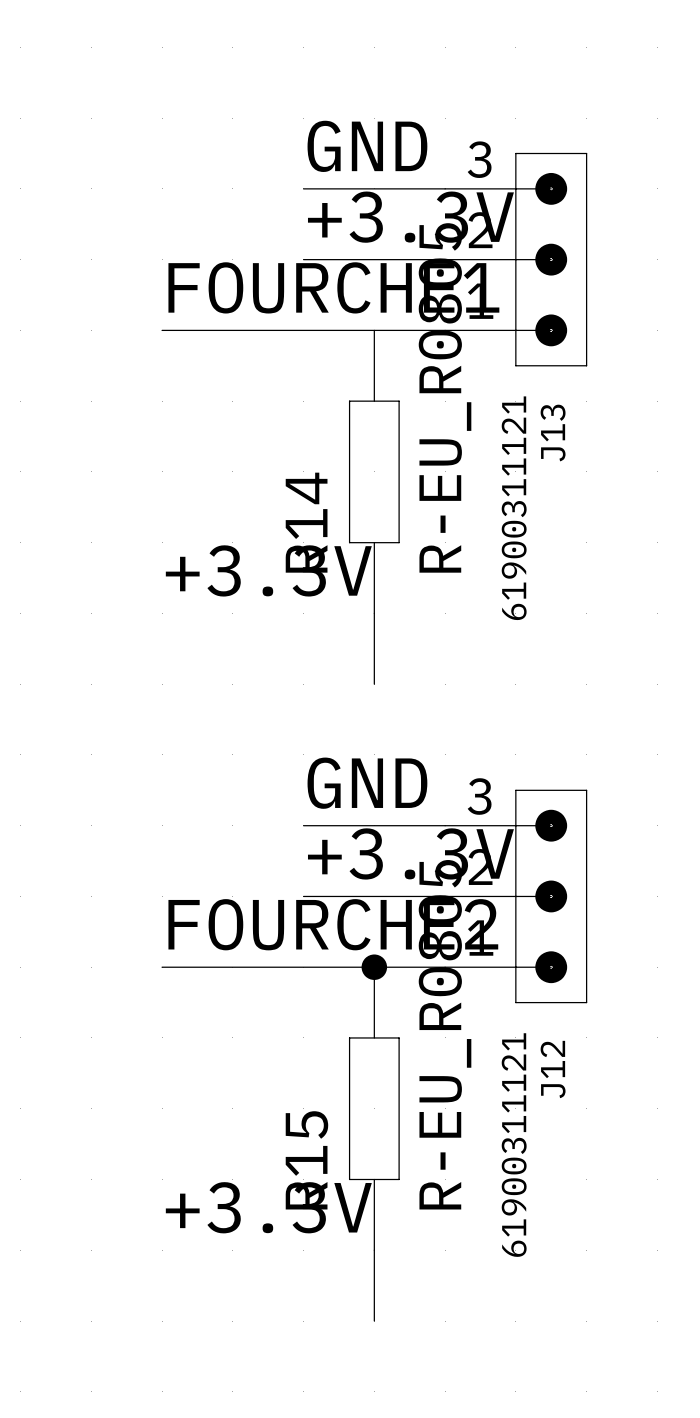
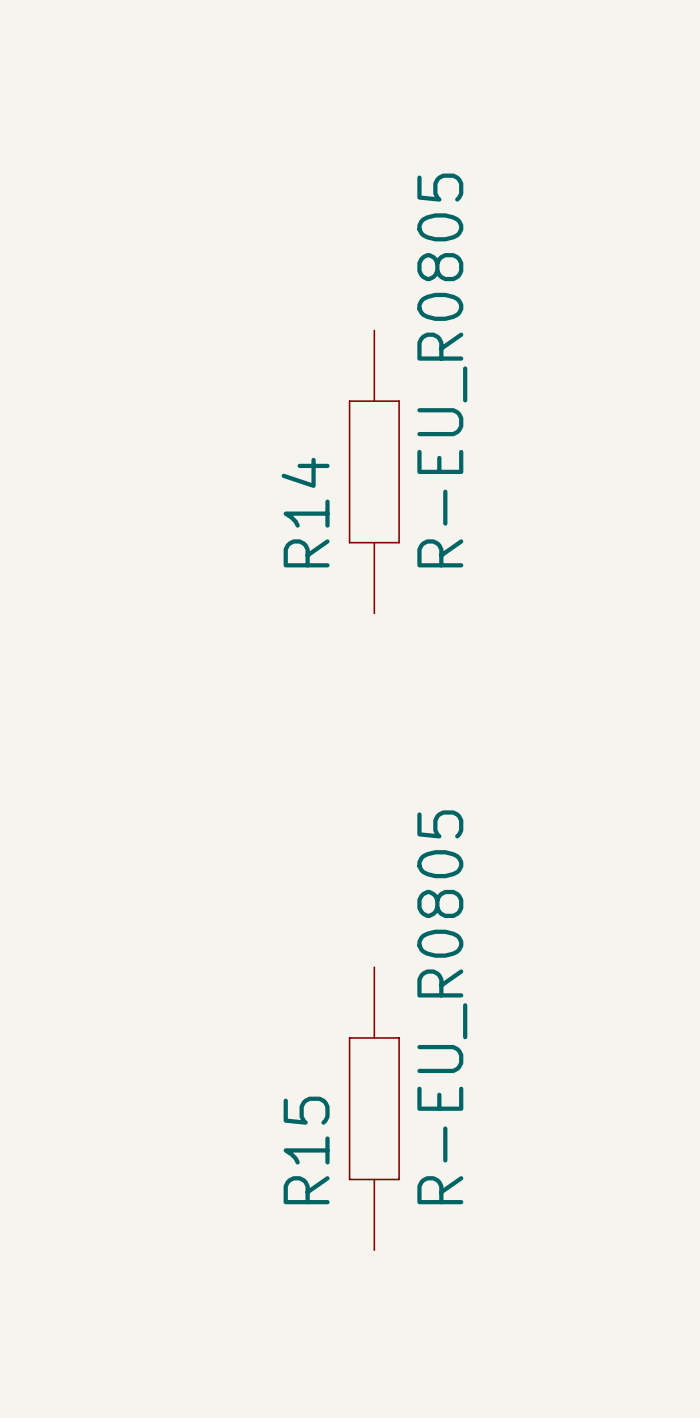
label: GND (367, 146) -> none
wire: (303, 188) (445, 188) -> none
label: +3.3V (410, 217) -> none
wire: (303, 259) (445, 259) -> none
J13: 61900311121 (515, 259) -> none
label: FOURCHE1 (333, 287) -> none
wire: (162, 330) (445, 330) -> none
label: +3.3V (268, 570) -> none
wire: (374, 613) (374, 684) -> none
label: GND (367, 783) -> none
wire: (303, 825) (445, 825) -> none
label: +3.3V (410, 853) -> none
wire: (303, 896) (445, 896) -> none
J12: 61900311121 (515, 896) -> none
label: FOURCHE2 (333, 924) -> none
wire: (162, 967) (445, 967) -> none
junction: (374, 967) -> none
label: +3.3V (268, 1207) -> none
wire: (374, 1250) (374, 1321) -> none

